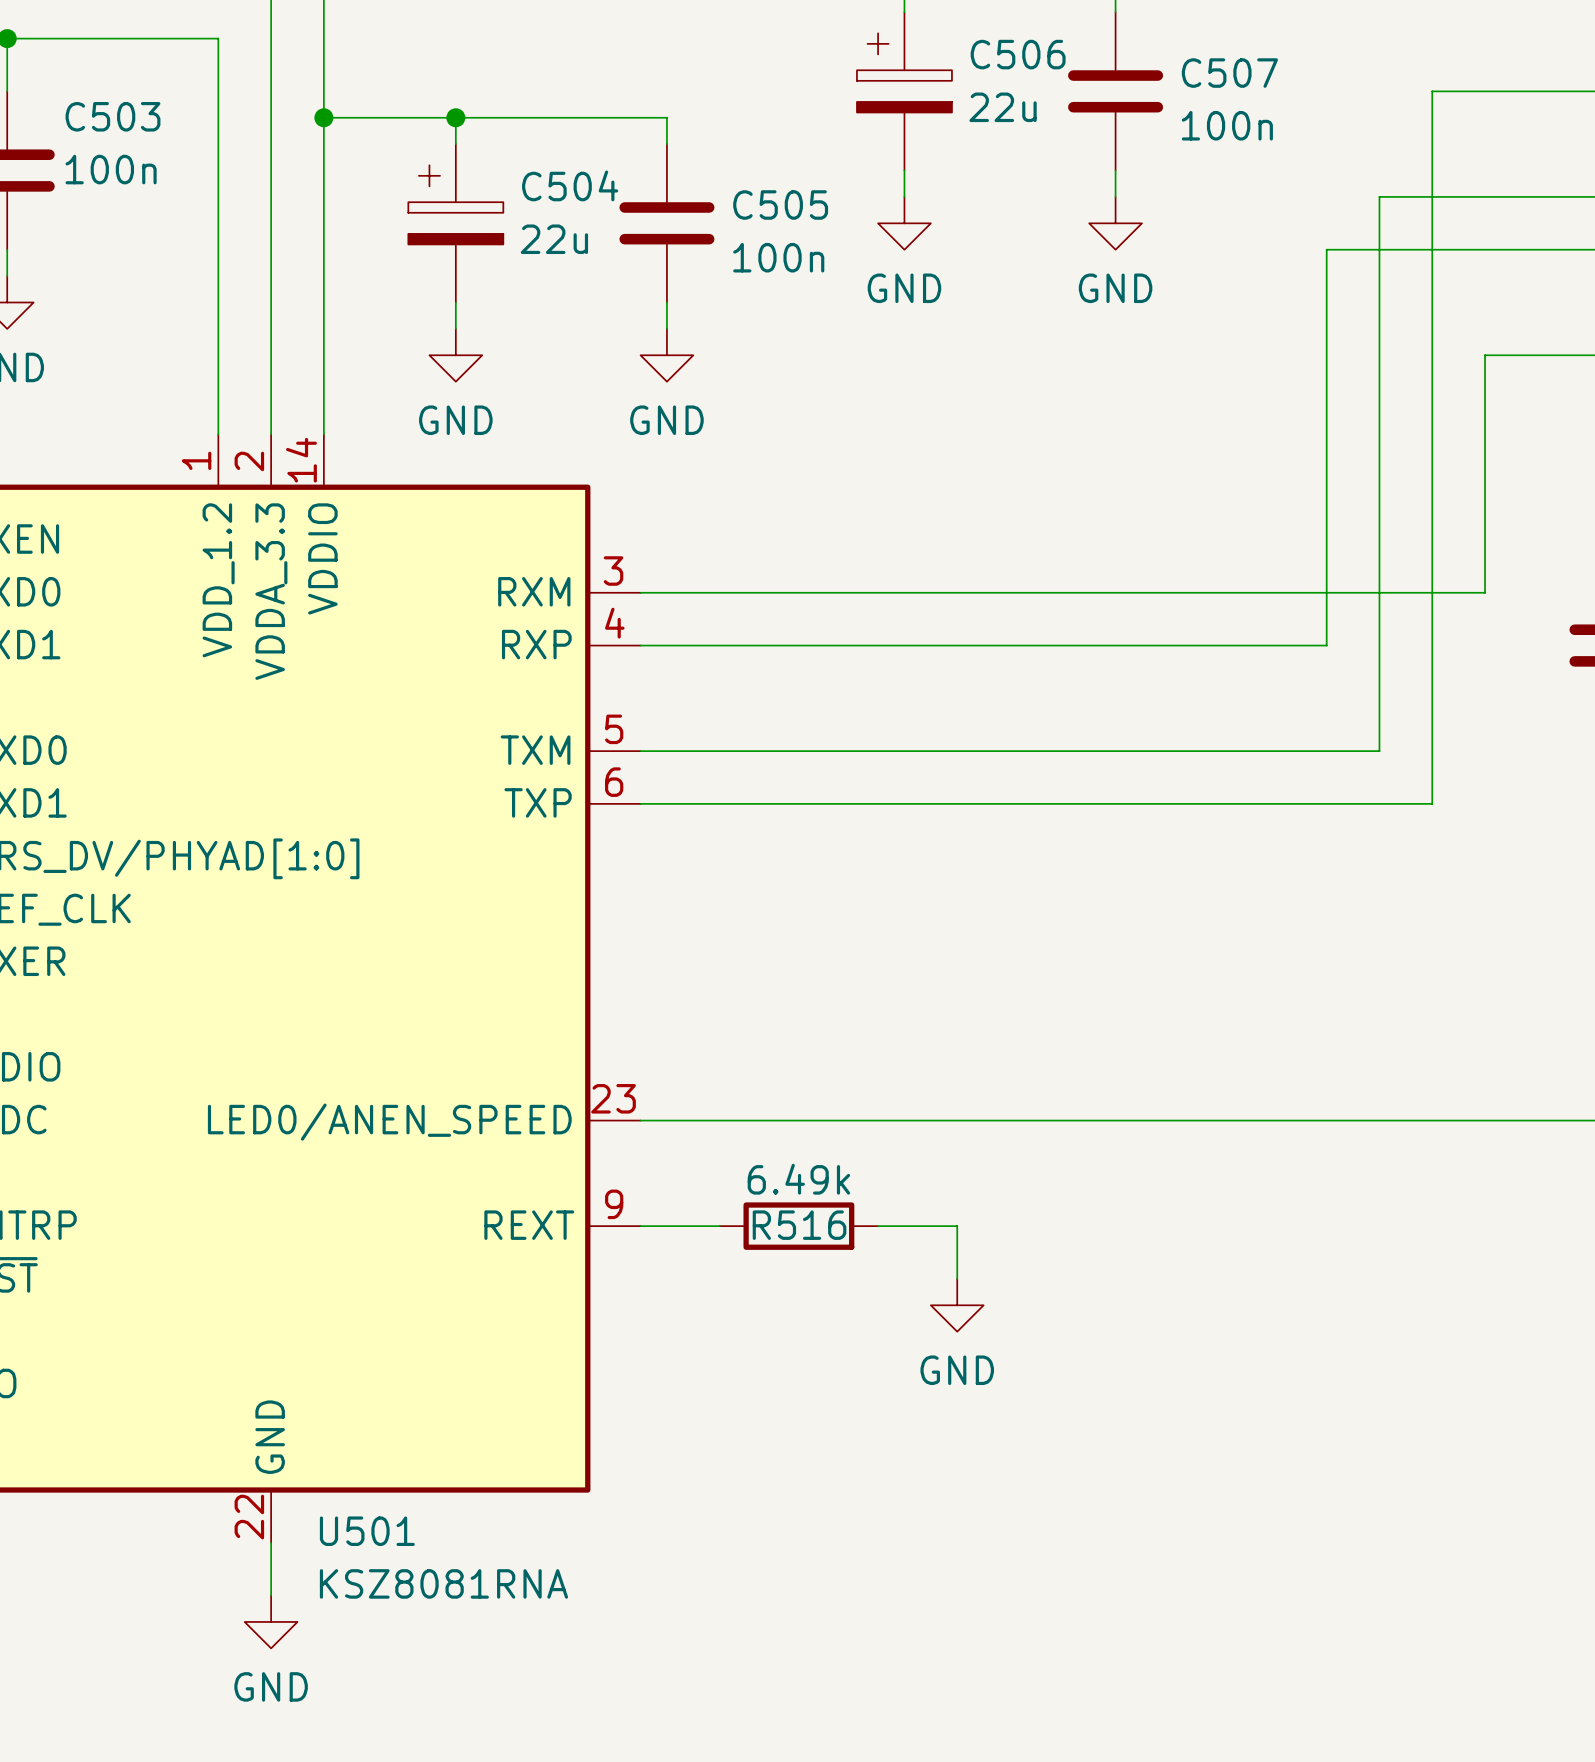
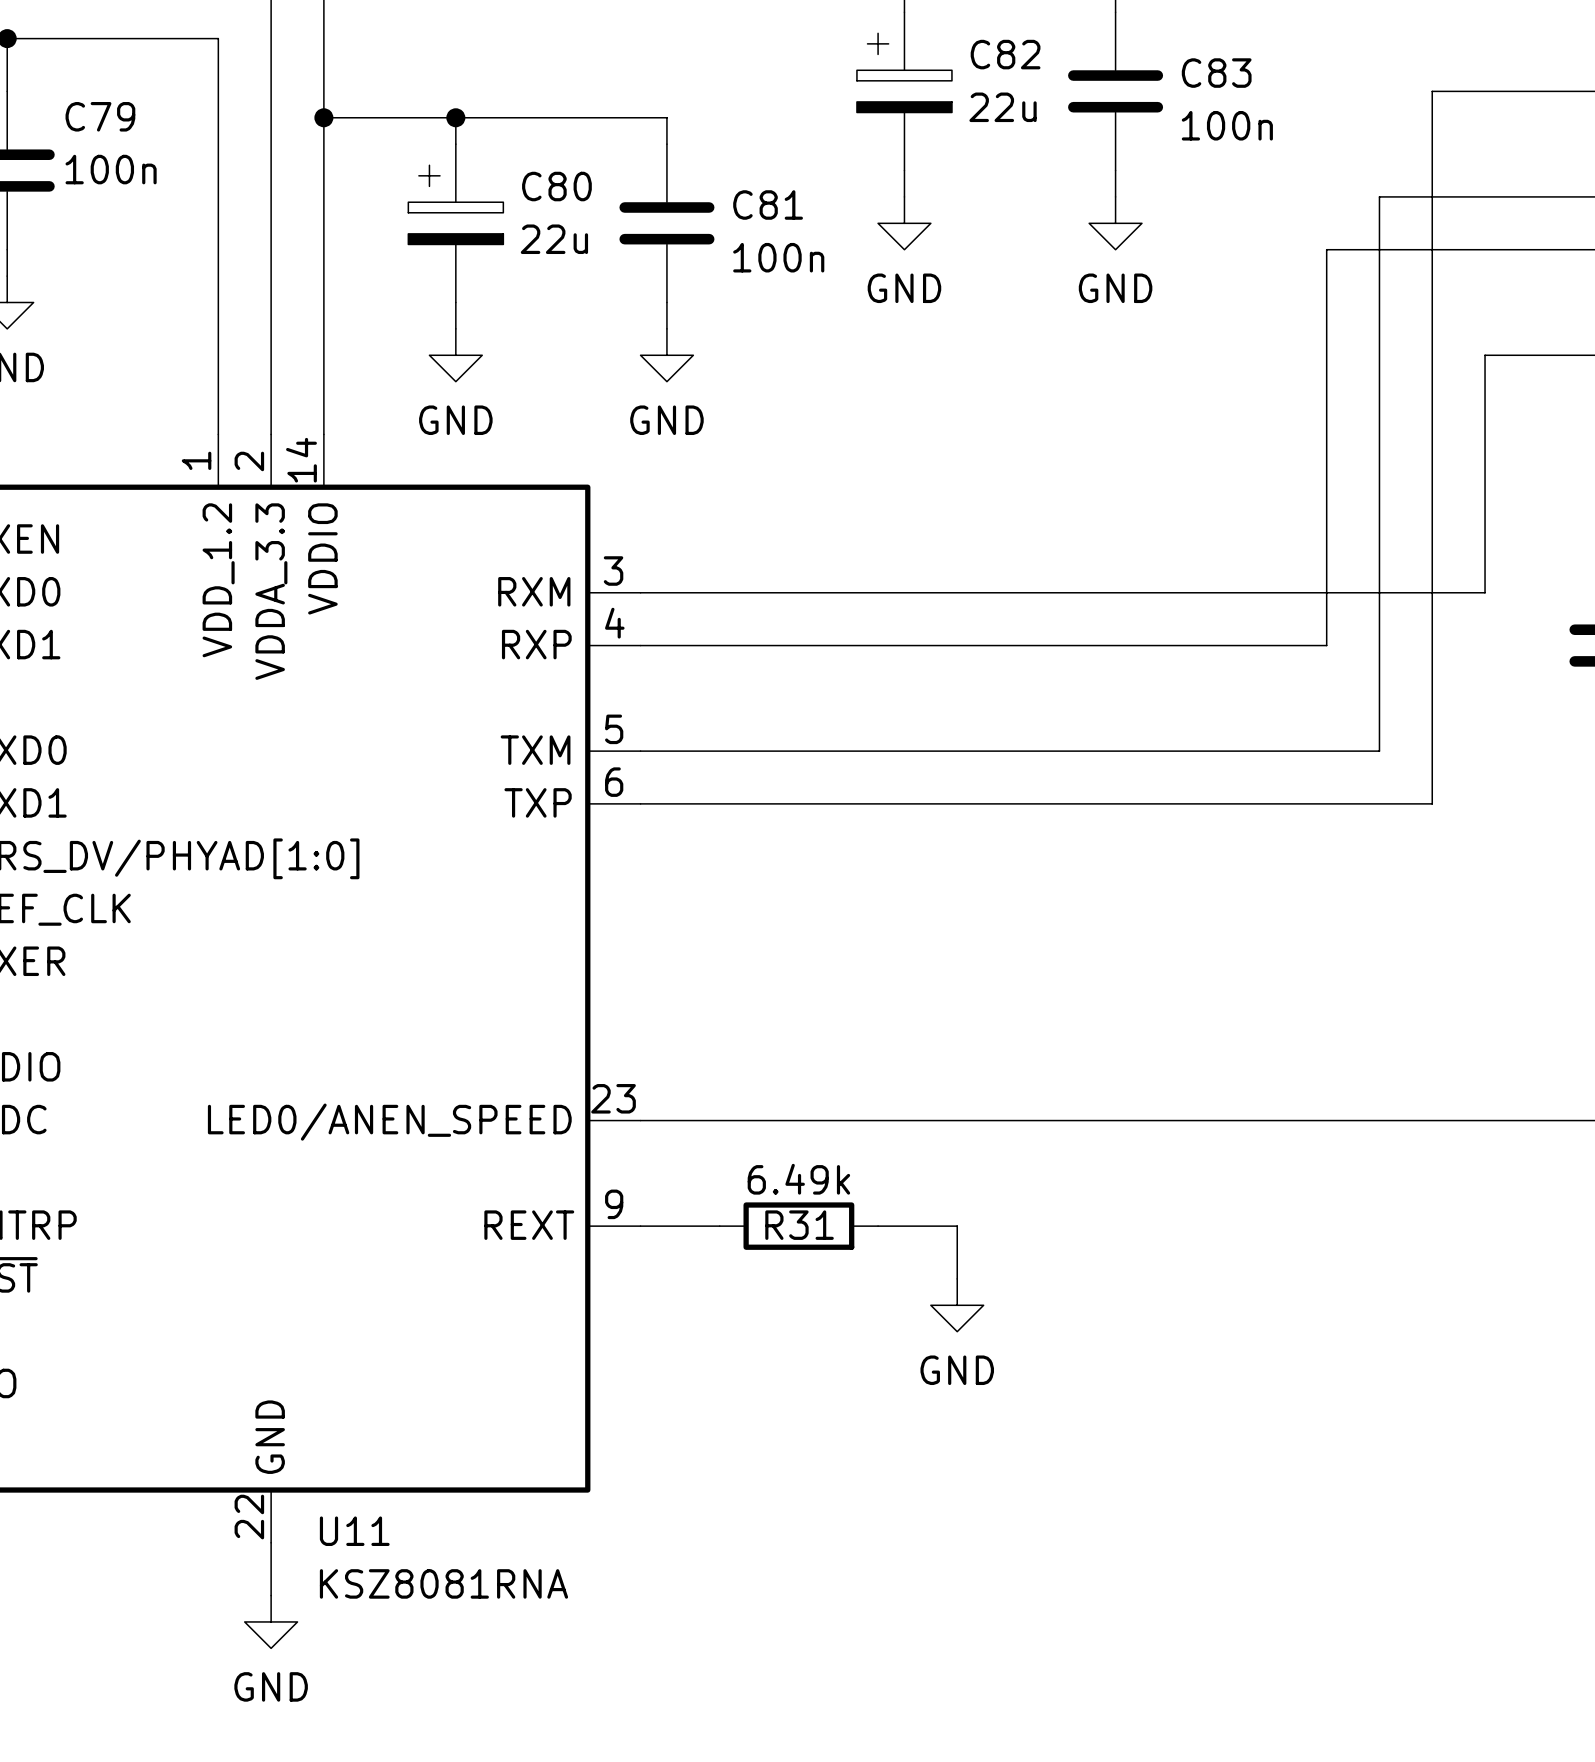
C506 name: C506 (1018, 54) -> C82 (1005, 54)
C507 name: C507 (1229, 73) -> C83 (1216, 73)
C503 name: C503 (112, 116) -> C79 (100, 116)
C504 name: C504 (570, 185) -> C80 (556, 186)
C505 name: C505 (780, 205) -> C81 (768, 205)
R516 name: R516 (799, 1225) -> R31 (799, 1225)
U501 name: U501 (367, 1531) -> U11 (354, 1531)

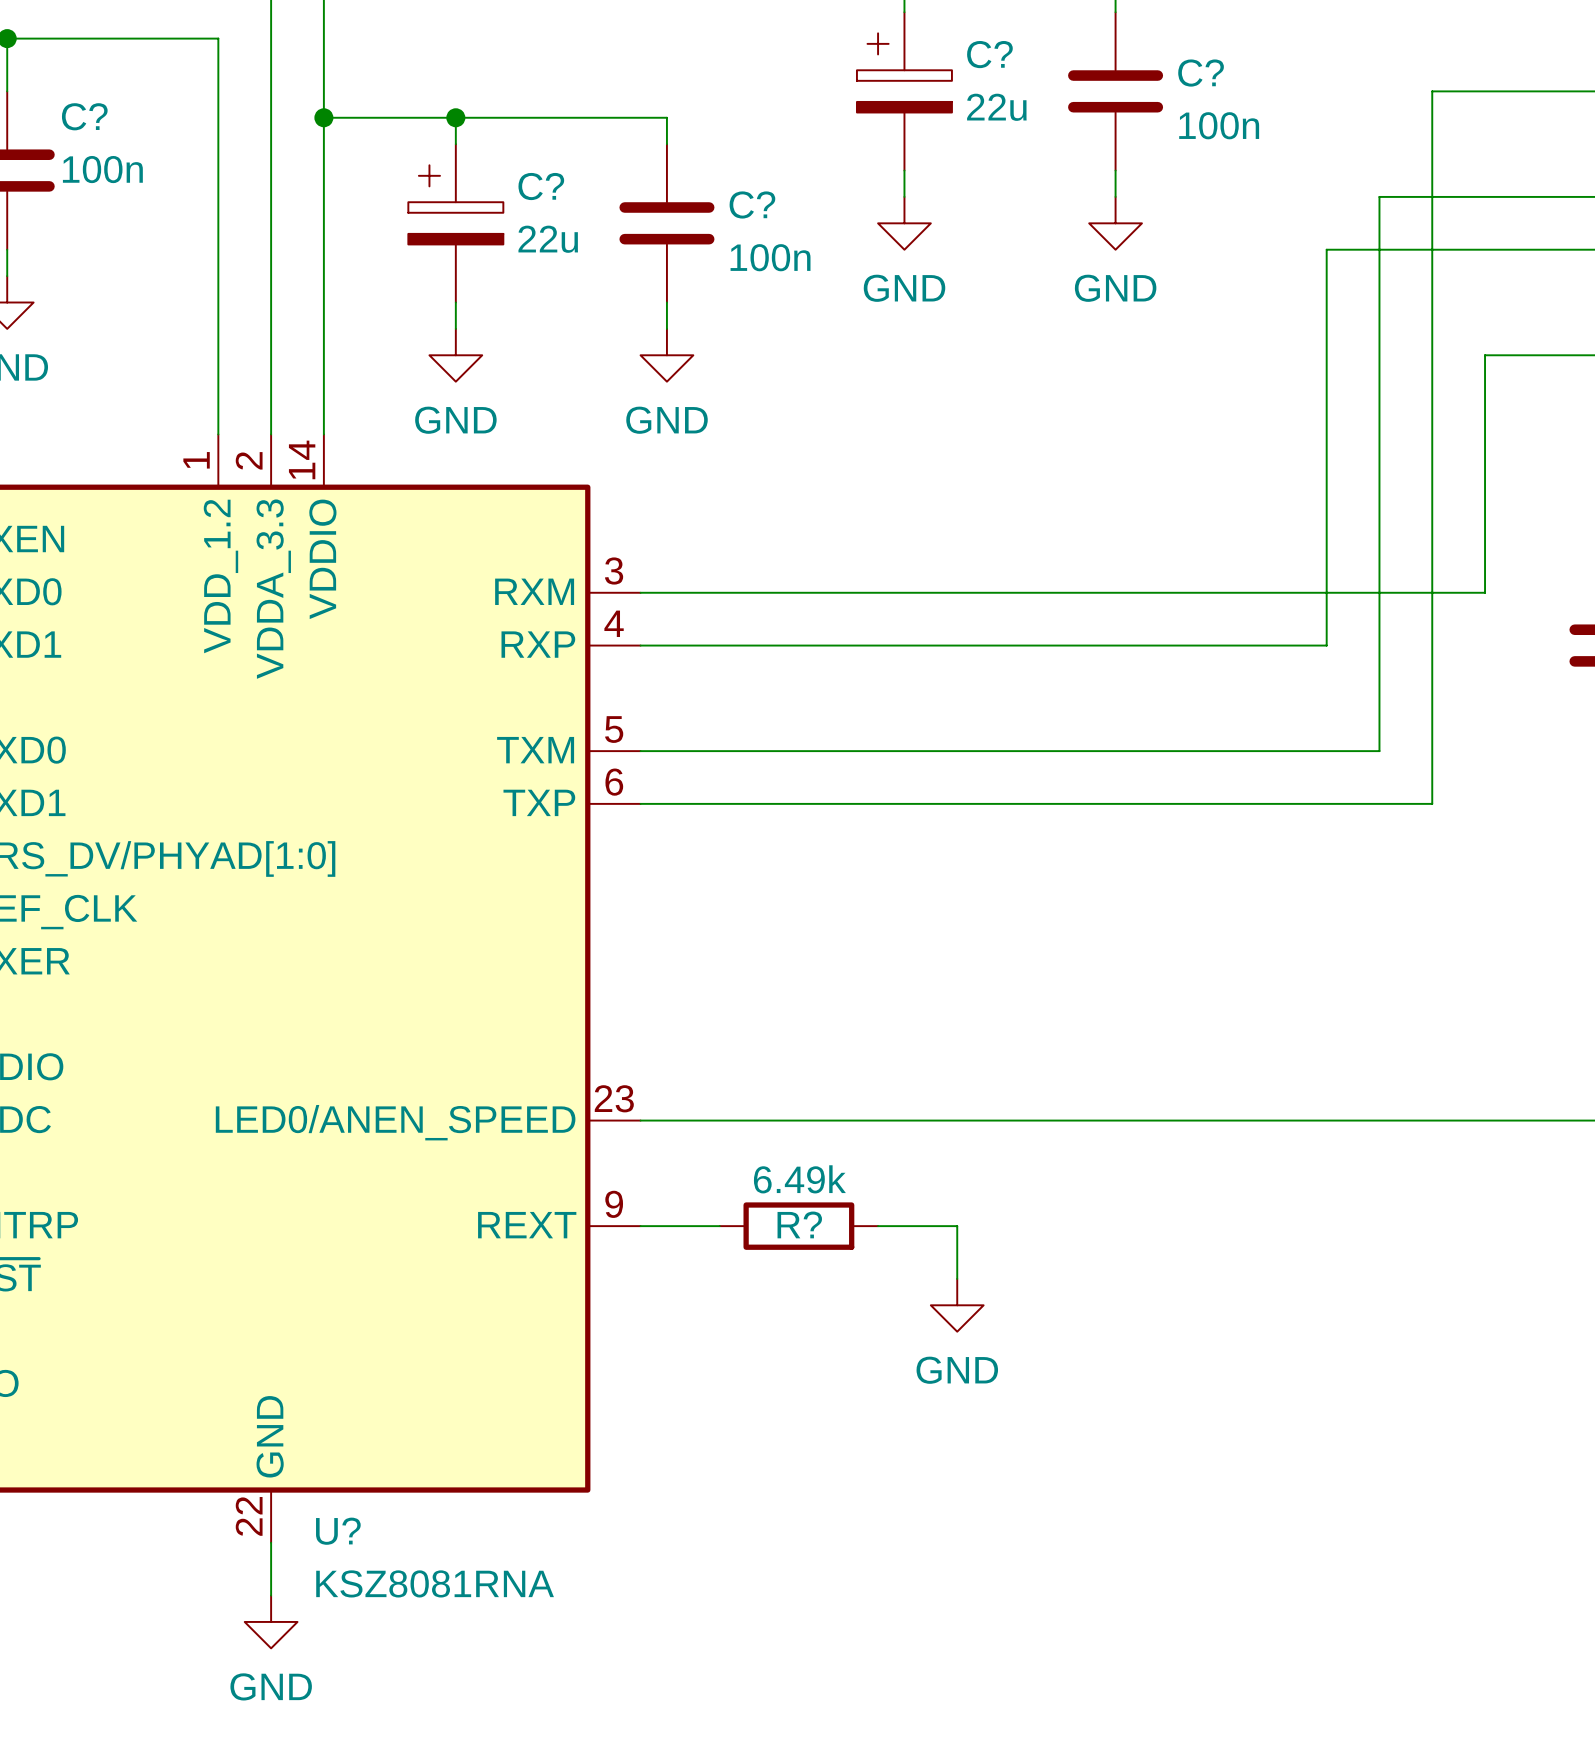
C82 name: C82 (1005, 54) -> C? (989, 54)
C83 name: C83 (1216, 73) -> C? (1201, 73)
C79 name: C79 (100, 116) -> C? (84, 116)
C80 name: C80 (556, 186) -> C? (541, 186)
C81 name: C81 (768, 205) -> C? (752, 204)
R31 name: R31 (799, 1225) -> R? (799, 1224)
U11 name: U11 (354, 1531) -> U? (338, 1531)

